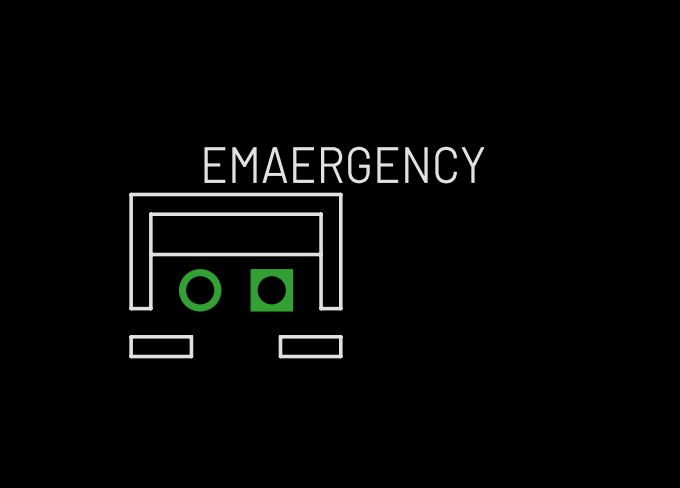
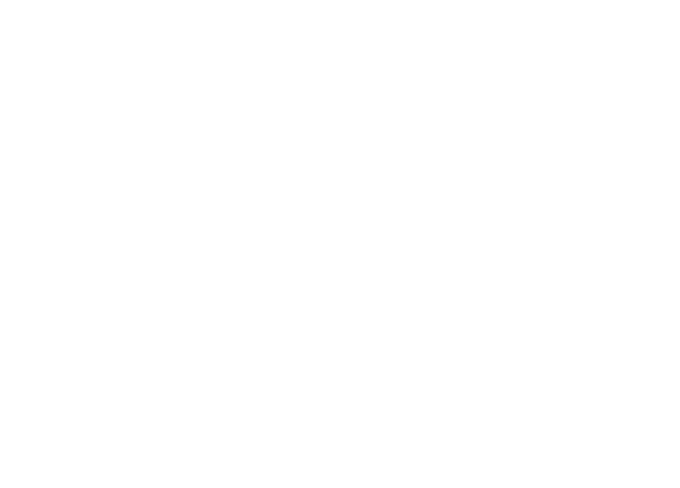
EMAERGENCY: (235, 275) -> none

